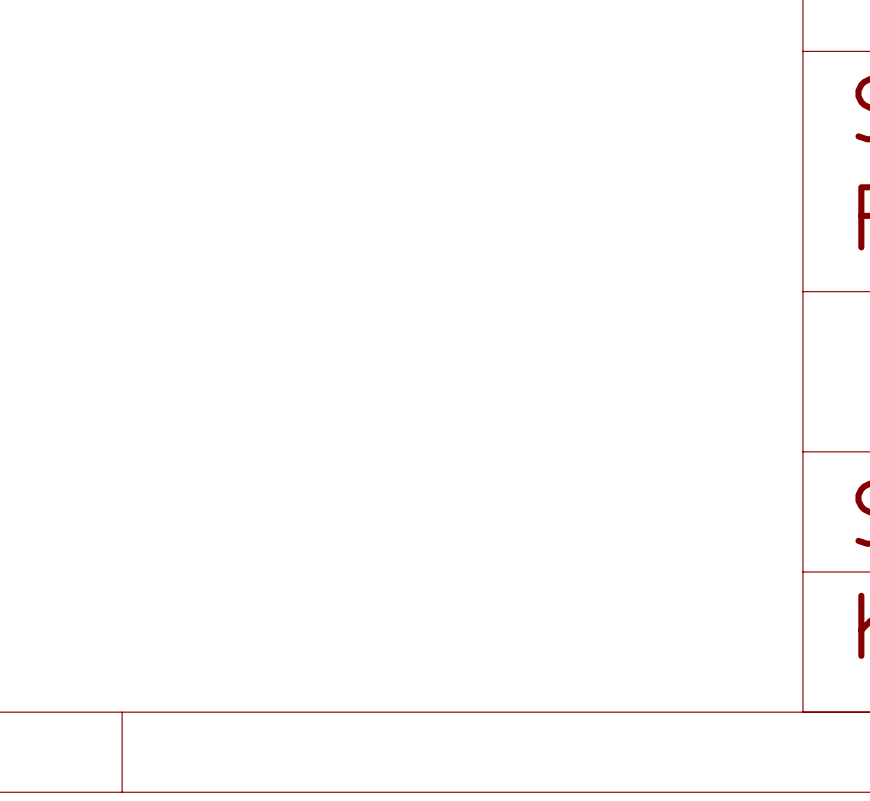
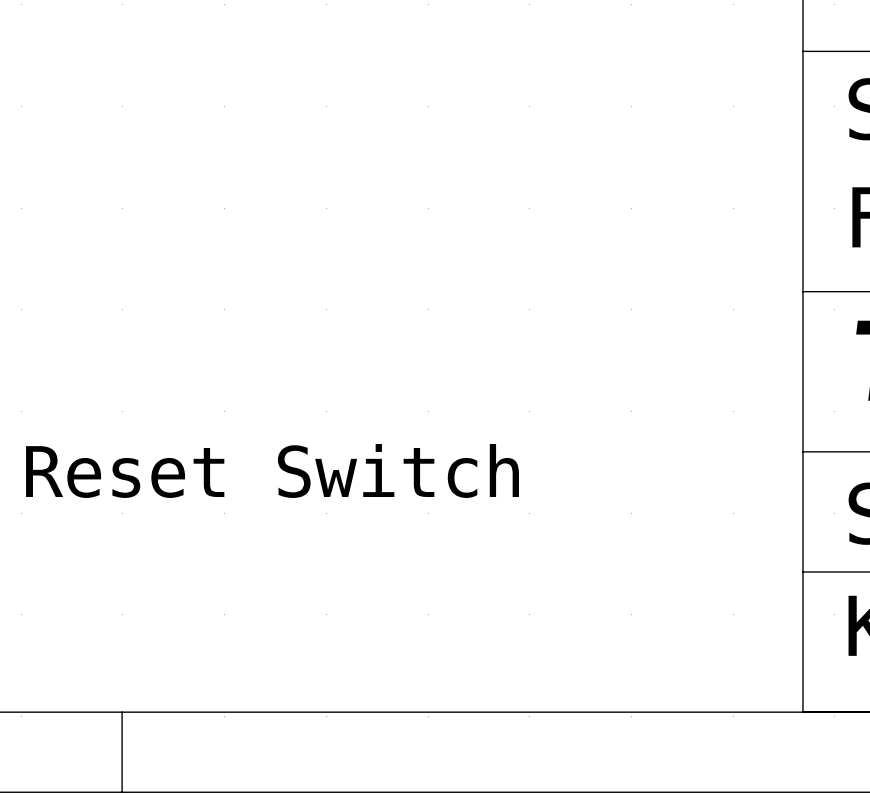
text: none -> Reset Switch (272, 470)

